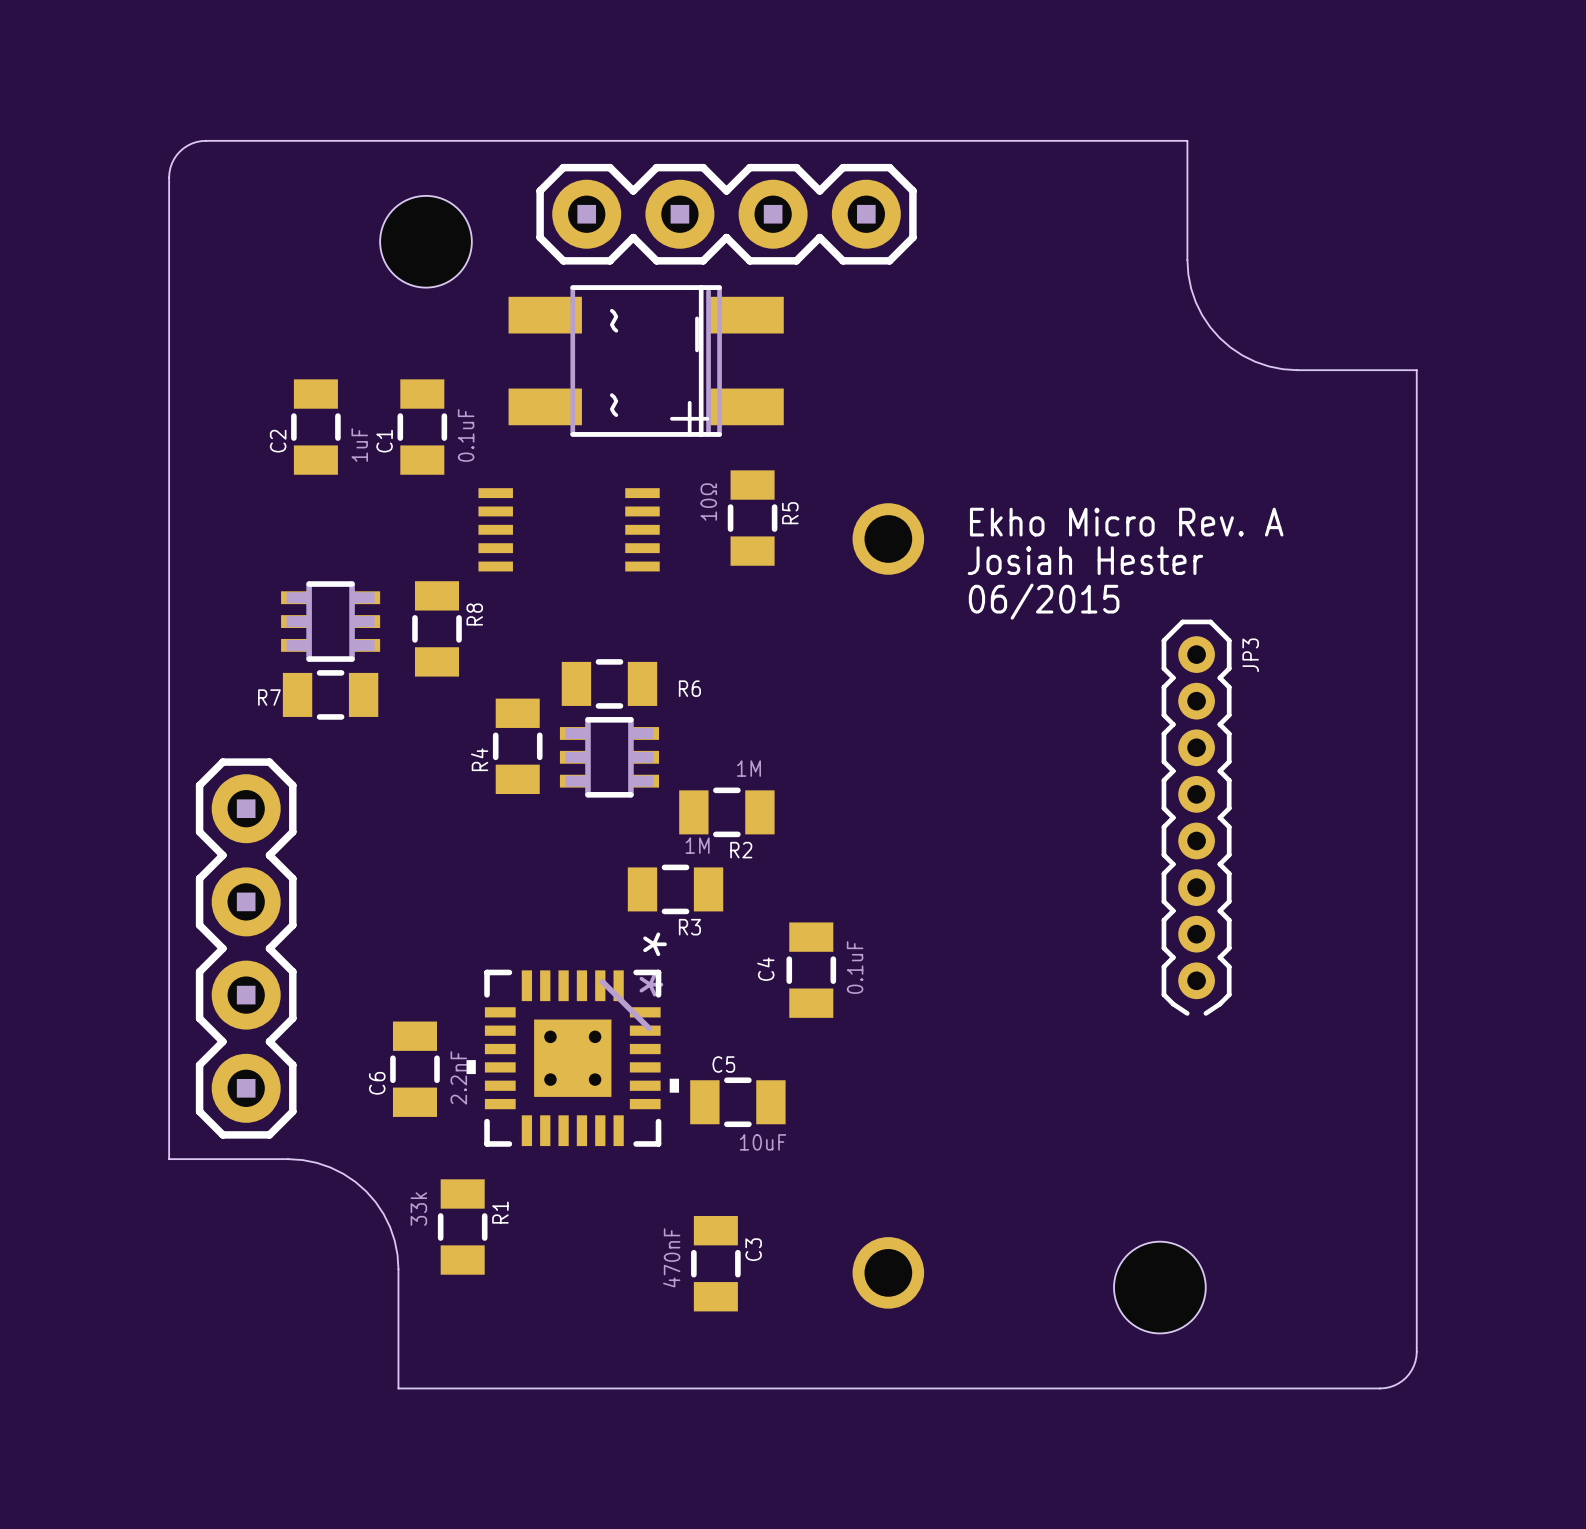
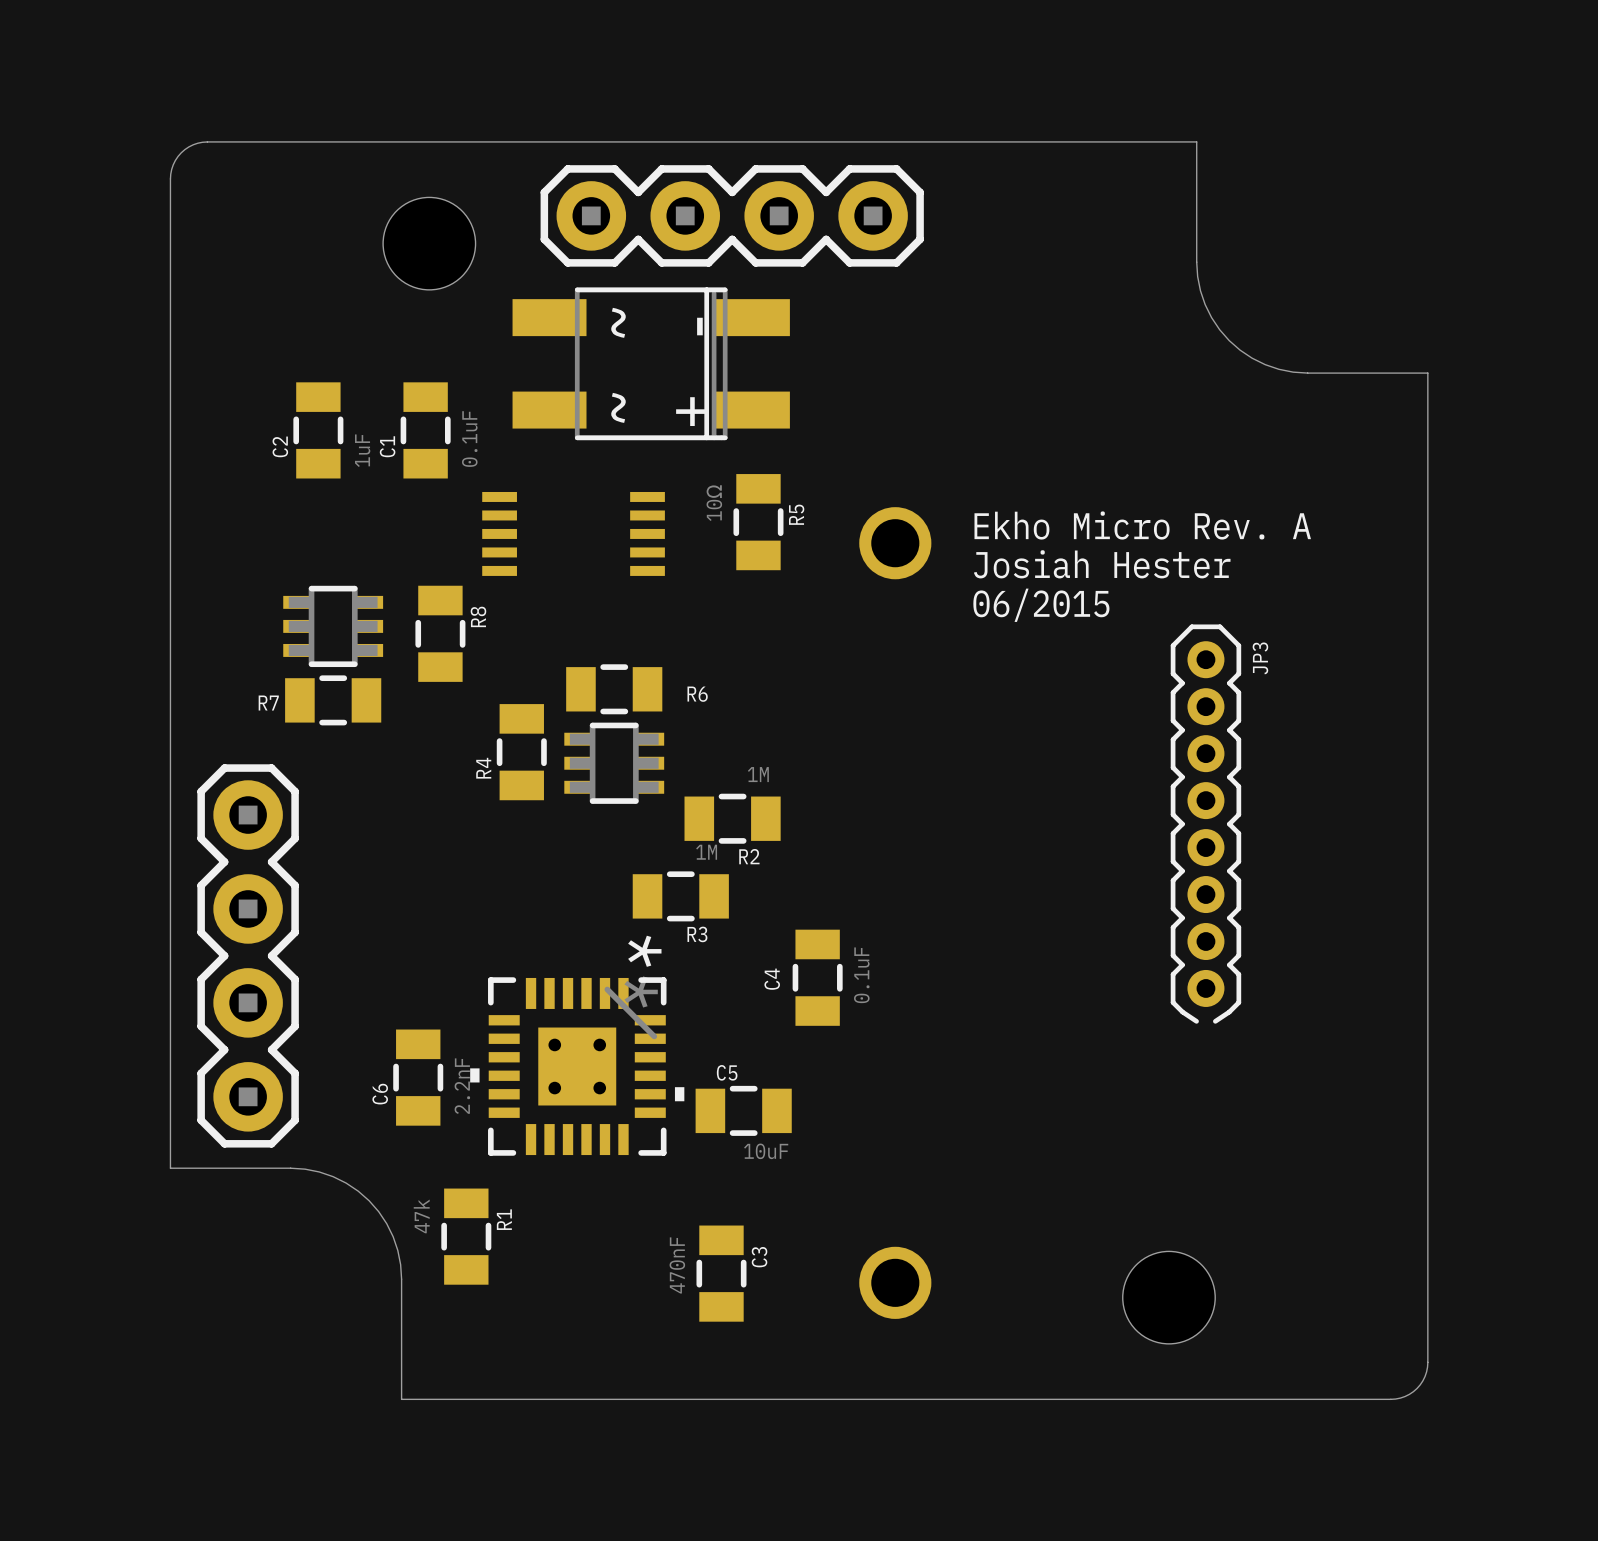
R1 value: 33k (418, 1209) -> 47k (421, 1216)

